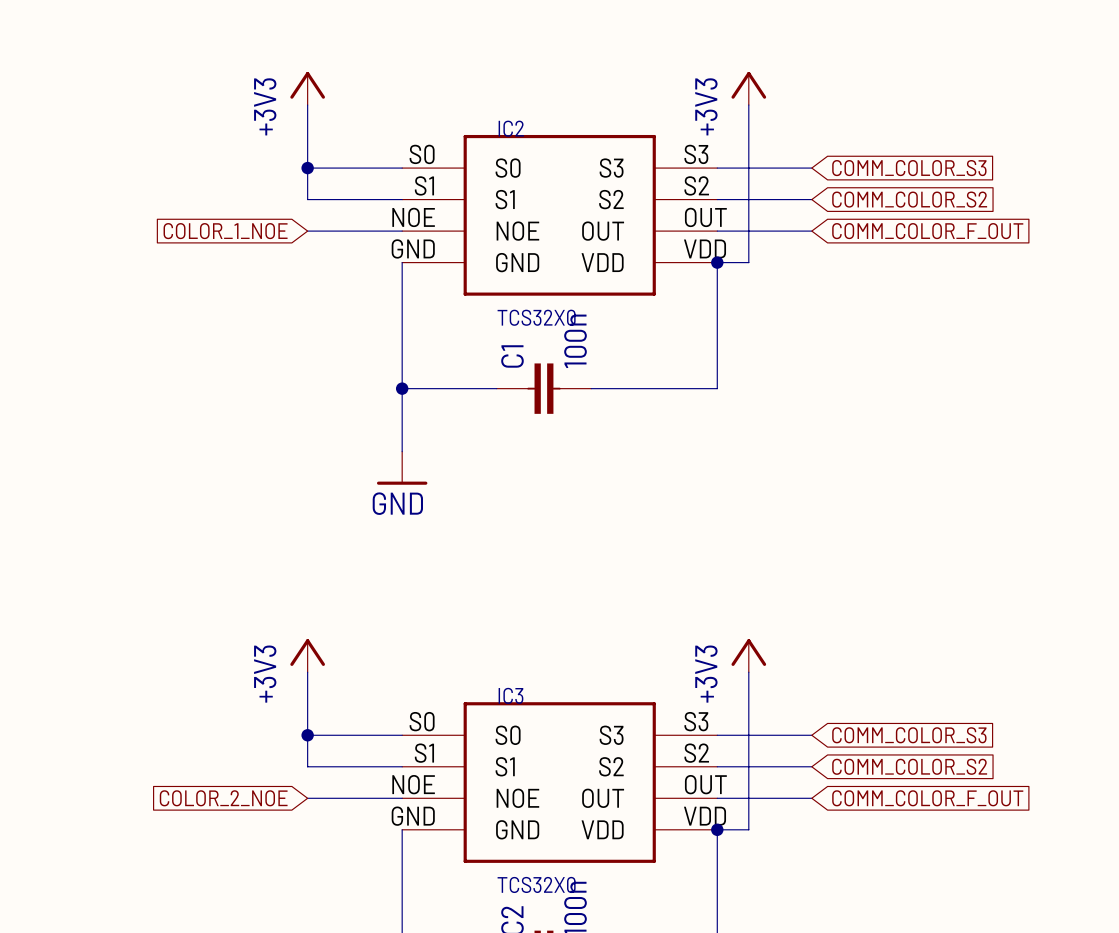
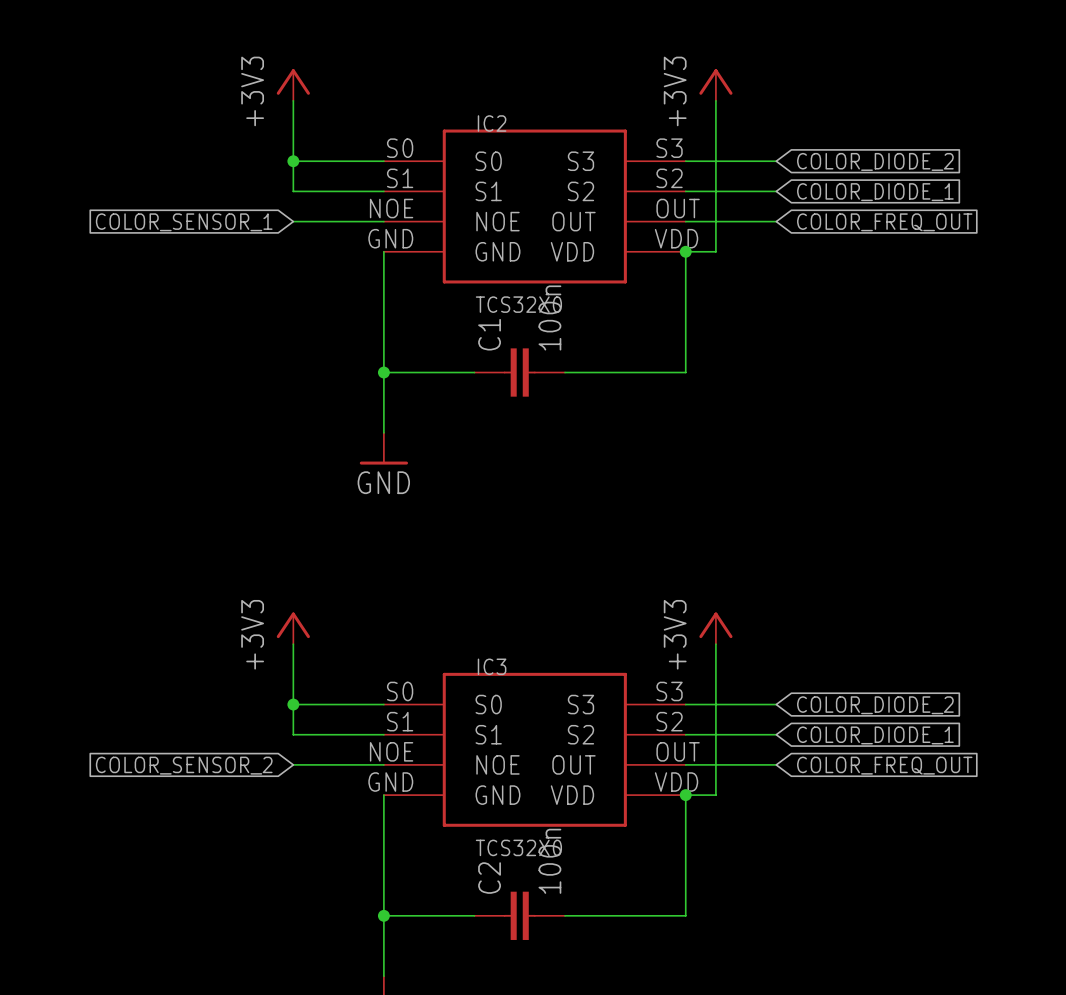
global label: COMM_COLOR_S3 (909, 168) -> COLOR_DIODE_2 (875, 161)
global label: COMM_COLOR_S2 (909, 199) -> COLOR_DIODE_1 (875, 192)
global label: COLOR_1_NOE (225, 231) -> COLOR_SENSOR_1 (184, 222)
global label: COMM_COLOR_F_OUT (927, 231) -> COLOR_FREQ_OUT (884, 222)
global label: COMM_COLOR_S3 (909, 735) -> COLOR_DIODE_2 (875, 705)
global label: COMM_COLOR_S2 (909, 766) -> COLOR_DIODE_1 (875, 735)
global label: COLOR_2_NOE (223, 798) -> COLOR_SENSOR_2 (184, 765)
global label: COMM_COLOR_F_OUT (927, 798) -> COLOR_FREQ_OUT (884, 765)

